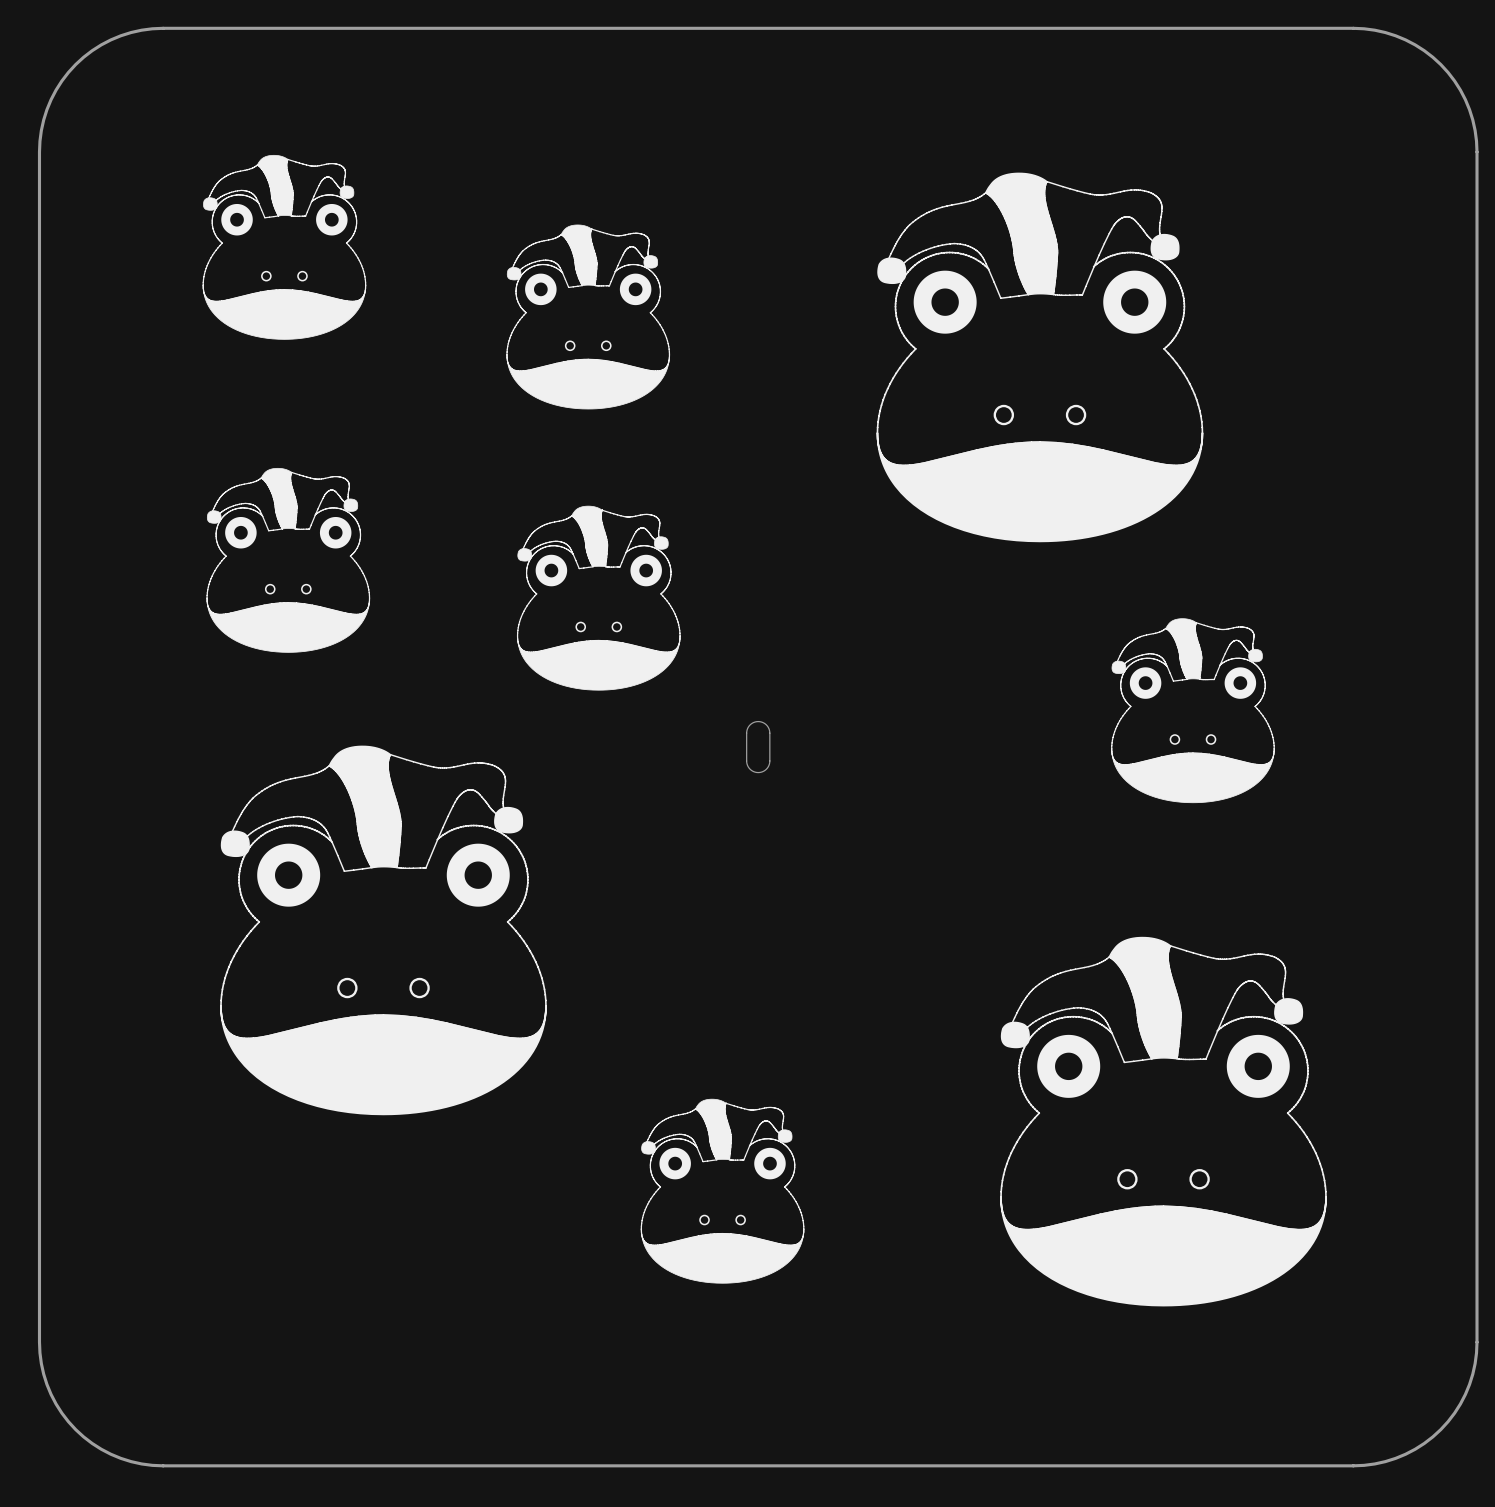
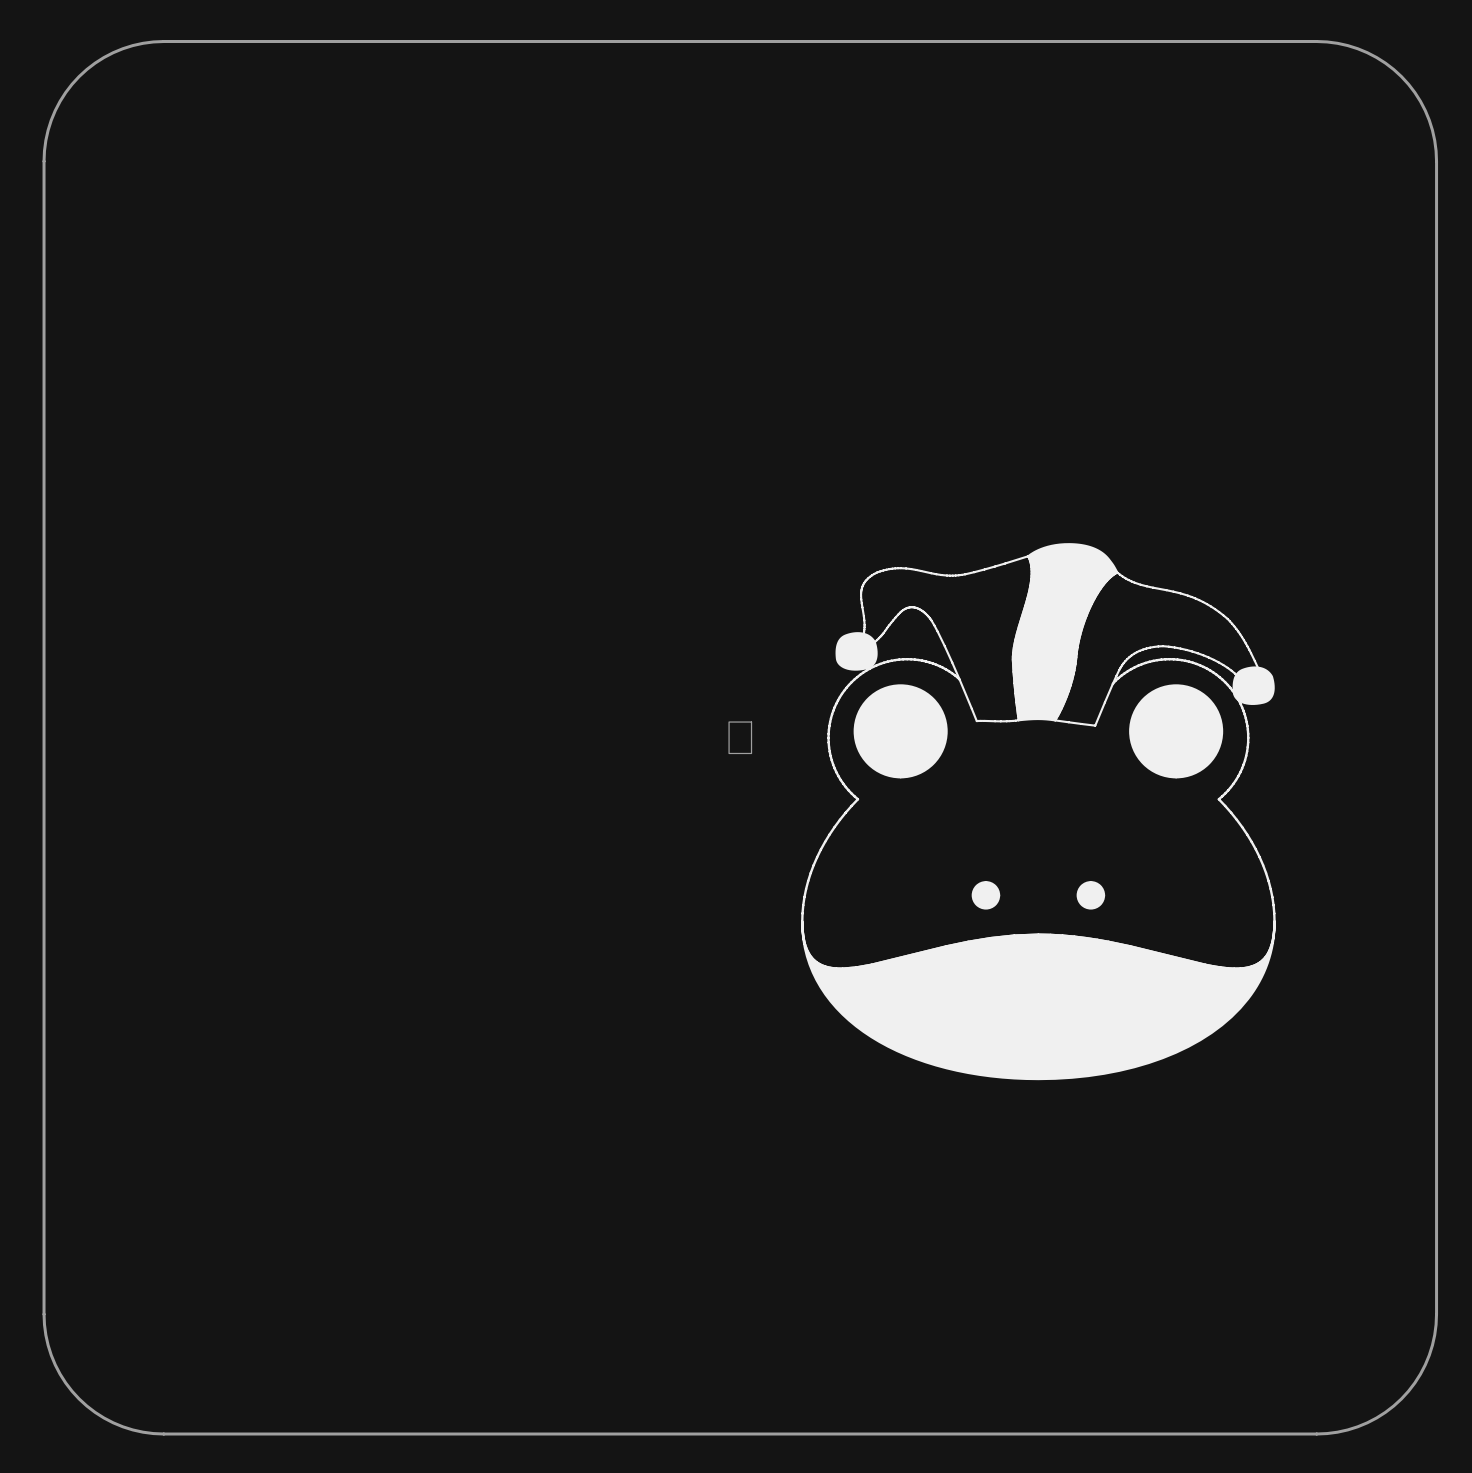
drawing: [203, 154, 294, 236] -> none
line: (287, 159) (287, 169) (293, 194) (291, 215) (305, 216) (319, 185) (325, 177) (330, 177) (340, 189) (344, 186) (345, 171) (339, 165) (331, 163) (311, 166) (287, 159) -> none
line: (257, 165) (223, 177) (215, 185) (208, 198) (214, 201) (229, 192) (247, 191) (255, 197) (264, 217) (278, 215) (273, 204) (267, 177) (257, 165) -> none
drawing: [877, 172, 1059, 334] -> none
line: (1046, 181) (1044, 191) (1045, 201) (1057, 250) (1053, 294) (1082, 295) (1109, 233) (1114, 224) (1121, 218) (1127, 216) (1132, 218) (1152, 240) (1160, 235) (1161, 204) (1158, 197) (1151, 192) (1134, 189) (1094, 194) (1046, 181) -> none
drawing: [316, 185, 355, 236] -> none
line: (985, 192) (994, 201) (1005, 218) (1011, 235) (1017, 270) (1028, 294) (1000, 298) (982, 256) (975, 249) (965, 245) (950, 243) (930, 248) (912, 256) (900, 266) (888, 259) (902, 233) (918, 218) (937, 208) (973, 199) (985, 192) -> none
line: (311, 202) (321, 195) (335, 195) (345, 200) (353, 210) (356, 219) (355, 228) (346, 243) (357, 257) (364, 273) (365, 290) (359, 300) (347, 300) (308, 292) (284, 289) (260, 292) (219, 301) (206, 298) (203, 288) (205, 271) (211, 257) (222, 243) (215, 235) (212, 226) (212, 217) (215, 209) (224, 199) (235, 195) (247, 196) (258, 203) -> none
drawing: [506, 224, 598, 306] -> none
line: (591, 229) (590, 239) (597, 263) (594, 285) (609, 285) (622, 255) (628, 247) (634, 247) (644, 258) (648, 255) (649, 240) (643, 234) (635, 233) (615, 235) (591, 229) -> none
drawing: [1103, 233, 1180, 334] -> none
line: (561, 234) (527, 247) (519, 255) (512, 267) (518, 271) (533, 262) (551, 260) (559, 266) (568, 287) (582, 285) (577, 273) (570, 247) (561, 234) -> none
drawing: [619, 255, 659, 306] -> none
line: (1093, 266) (1114, 254) (1127, 252) (1141, 253) (1162, 263) (1172, 272) (1179, 283) (1184, 301) (1182, 319) (1175, 335) (1164, 348) (1186, 378) (1199, 410) (1202, 427) (1201, 444) (1197, 456) (1189, 462) (1178, 465) (1165, 464) (1088, 447) (1039, 442) (991, 447) (909, 465) (893, 464) (884, 458) (879, 448) (877, 439) (881, 405) (893, 378) (915, 348) (902, 333) (896, 316) (896, 298) (902, 280) (909, 270) (919, 261) (941, 253) (966, 255) (978, 260) (988, 269) -> none
drawing: [202, 270, 367, 340] -> none
line: (615, 271) (625, 265) (638, 265) (649, 269) (657, 279) (660, 288) (659, 297) (650, 312) (661, 327) (668, 343) (669, 360) (663, 369) (650, 370) (612, 361) (588, 359) (564, 361) (523, 370) (510, 367) (507, 357) (509, 340) (514, 327) (526, 312) (519, 304) (516, 296) (516, 287) (519, 278) (527, 269) (538, 264) (551, 265) (562, 272) -> none
drawing: [506, 340, 670, 410] -> none
drawing: [876, 404, 1204, 543] -> none
drawing: [206, 467, 298, 549] -> none
line: (291, 472) (291, 482) (297, 507) (295, 528) (309, 529) (322, 498) (328, 490) (334, 491) (344, 502) (348, 499) (349, 484) (343, 478) (335, 476) (315, 479) (291, 472) -> none
line: (261, 478) (270, 490) (277, 517) (282, 528) (268, 530) (259, 510) (251, 504) (233, 505) (218, 514) (212, 511) (219, 498) (227, 490) (261, 478) -> none
drawing: [319, 498, 359, 549] -> none
drawing: [517, 505, 608, 587] -> none
line: (602, 510) (626, 516) (646, 514) (654, 515) (659, 521) (658, 537) (655, 539) (645, 528) (639, 528) (633, 536) (619, 567) (605, 566) (607, 544) (601, 520) (602, 510) -> none
line: (315, 515) (325, 508) (338, 508) (349, 513) (357, 523) (360, 532) (359, 541) (350, 556) (361, 570) (368, 587) (369, 603) (363, 613) (350, 614) (312, 605) (288, 602) (264, 605) (223, 614) (210, 611) (207, 601) (209, 584) (214, 570) (226, 556) (219, 548) (216, 539) (216, 530) (219, 522) (228, 512) (239, 508) (251, 509) (262, 516) -> none
line: (571, 515) (581, 528) (587, 554) (593, 566) (579, 568) (570, 547) (561, 542) (543, 543) (529, 552) (523, 549) (530, 536) (537, 528) (571, 515) -> none
drawing: [630, 536, 669, 587] -> none
drawing: none -> [1011, 543, 1119, 722]
line: (625, 552) (636, 546) (649, 546) (660, 551) (668, 561) (670, 570) (670, 579) (660, 593) (672, 608) (678, 624) (679, 641) (673, 650) (661, 651) (622, 642) (598, 640) (574, 642) (533, 652) (521, 648) (517, 638) (519, 622) (525, 608) (536, 593) (530, 586) (526, 577) (526, 568) (529, 559) (538, 550) (549, 546) (561, 547) (573, 554) -> none
drawing: [206, 583, 370, 653] -> none
drawing: [1111, 618, 1203, 699] -> none
drawing: [517, 621, 681, 691] -> none
line: (1196, 622) (1220, 629) (1240, 626) (1248, 628) (1253, 634) (1253, 649) (1249, 652) (1239, 641) (1233, 641) (1227, 648) (1214, 679) (1199, 679) (1201, 657) (1195, 632) (1196, 622) -> none
line: (1165, 628) (1175, 641) (1181, 667) (1187, 679) (1173, 681) (1164, 660) (1155, 654) (1138, 656) (1123, 665) (1117, 661) (1124, 648) (1132, 641) (1165, 628) -> none
drawing: none -> [835, 632, 948, 779]
drawing: [1224, 648, 1263, 699] -> none
line: (1219, 665) (1230, 659) (1243, 658) (1254, 663) (1262, 673) (1265, 682) (1264, 691) (1255, 706) (1266, 721) (1272, 737) (1273, 754) (1267, 763) (1255, 764) (1217, 755) (1192, 753) (1168, 755) (1127, 764) (1115, 761) (1111, 751) (1113, 734) (1119, 721) (1130, 706) (1124, 698) (1121, 690) (1121, 681) (1124, 672) (1132, 662) (1143, 658) (1156, 659) (1167, 666) -> none
drawing: none -> [1232, 666, 1275, 705]
line: none -> (959, 679) (945, 669) (929, 662) (911, 659) (891, 660) (876, 665) (860, 674) (846, 687) (836, 703) (828, 729) (830, 755) (840, 780) (857, 799) (839, 819) (825, 841) (813, 865) (806, 889) (802, 913) (803, 937) (809, 955) (820, 964) (836, 968) (856, 967) (968, 941) (1014, 935) (1038, 934) (1074, 936) (1108, 941) (1227, 968) (1251, 966) (1263, 959) (1271, 944) (1274, 930) (1273, 905) (1268, 880) (1251, 841) (1236, 819) (1218, 799) (1238, 776) (1247, 751) (1247, 725) (1238, 700) (1227, 684) (1213, 672) (1196, 663) (1181, 660) (1161, 659) (1145, 662) (1127, 671) (1112, 683)
line: none -> (959, 679) (934, 625) (927, 615) (918, 608) (910, 607) (901, 611) (874, 642) (863, 634) (864, 620) (861, 595) (864, 583) (874, 573) (889, 569) (906, 568) (941, 575) (958, 575) (1028, 556) (1031, 569) (1030, 585) (1015, 640) (1012, 656) (1018, 720) (976, 721) (959, 679)
line: none -> (1112, 683) (1120, 667) (1129, 657) (1142, 649) (1158, 646) (1180, 648) (1203, 655) (1227, 667) (1240, 679) (1258, 669) (1238, 631) (1227, 618) (1215, 609) (1187, 595) (1134, 582) (1117, 572) (1103, 584) (1088, 610) (1080, 634) (1070, 685) (1055, 720) (1095, 725) (1112, 683)
part footprint: [746, 721, 771, 773] -> [728, 721, 752, 754]
drawing: [1111, 734, 1275, 804] -> none
drawing shape: [1205, 734, 1217, 745] -> [1129, 684, 1224, 779]
drawing: [220, 745, 402, 907] -> none
line: (390, 754) (438, 767) (478, 762) (494, 765) (501, 770) (505, 777) (503, 808) (496, 813) (476, 791) (471, 789) (464, 791) (458, 797) (452, 806) (425, 868) (396, 867) (401, 823) (388, 774) (388, 764) (390, 754) -> none
line: (329, 765) (317, 772) (280, 781) (261, 791) (245, 806) (231, 832) (244, 839) (256, 829) (273, 821) (293, 816) (309, 818) (319, 822) (325, 829) (344, 871) (371, 867) (361, 843) (354, 808) (348, 791) (338, 774) (329, 765) -> none
drawing: [446, 806, 524, 907] -> none
line: (437, 839) (458, 827) (471, 825) (484, 826) (506, 836) (515, 845) (522, 856) (527, 874) (526, 892) (519, 908) (507, 921) (530, 951) (543, 983) (545, 1000) (545, 1017) (540, 1029) (533, 1035) (522, 1038) (508, 1037) (431, 1020) (383, 1015) (335, 1020) (253, 1038) (237, 1037) (228, 1031) (222, 1021) (221, 1012) (225, 978) (236, 951) (259, 921) (245, 906) (239, 889) (239, 871) (245, 853) (253, 843) (262, 834) (284, 826) (309, 828) (321, 833) (332, 842) -> none
drawing: none -> [801, 881, 1276, 1081]
drawing: [1000, 936, 1182, 1098] -> none
line: (1170, 945) (1168, 955) (1168, 965) (1181, 1015) (1177, 1058) (1205, 1059) (1232, 997) (1238, 988) (1244, 982) (1251, 980) (1256, 982) (1276, 1005) (1283, 999) (1285, 969) (1281, 962) (1274, 957) (1258, 954) (1218, 958) (1170, 945) -> none
line: (1109, 957) (1118, 965) (1128, 982) (1134, 1000) (1141, 1034) (1151, 1058) (1124, 1062) (1105, 1021) (1099, 1014) (1089, 1009) (1073, 1008) (1053, 1012) (1036, 1020) (1024, 1030) (1011, 1023) (1025, 997) (1041, 982) (1060, 972) (1097, 964) (1109, 957) -> none
drawing: [220, 977, 547, 1116] -> none
drawing: [1226, 998, 1304, 1098] -> none
line: (1217, 1030) (1238, 1018) (1251, 1016) (1264, 1017) (1286, 1027) (1295, 1036) (1302, 1047) (1307, 1065) (1306, 1083) (1299, 1099) (1287, 1113) (1310, 1142) (1323, 1174) (1325, 1191) (1325, 1208) (1320, 1220) (1313, 1227) (1302, 1229) (1288, 1228) (1211, 1211) (1163, 1206) (1115, 1211) (1033, 1229) (1017, 1228) (1008, 1223) (1002, 1213) (1001, 1203) (1005, 1169) (1016, 1142) (1039, 1113) (1025, 1097) (1019, 1080) (1019, 1062) (1025, 1045) (1033, 1034) (1042, 1025) (1064, 1017) (1089, 1019) (1101, 1025) (1112, 1033) -> none
drawing: [641, 1098, 732, 1180] -> none
line: (726, 1103) (725, 1113) (731, 1137) (729, 1159) (743, 1160) (757, 1129) (763, 1121) (769, 1121) (778, 1132) (782, 1130) (783, 1114) (778, 1108) (769, 1107) (749, 1109) (726, 1103) -> none
line: (695, 1108) (661, 1121) (653, 1129) (646, 1142) (652, 1145) (667, 1136) (685, 1135) (693, 1140) (703, 1161) (716, 1159) (711, 1147) (705, 1121) (695, 1108) -> none
drawing: [754, 1129, 793, 1180] -> none
line: (749, 1145) (760, 1139) (773, 1139) (783, 1144) (792, 1154) (794, 1163) (794, 1172) (784, 1186) (795, 1201) (802, 1217) (803, 1234) (797, 1243) (785, 1244) (746, 1236) (722, 1233) (698, 1236) (657, 1245) (644, 1241) (641, 1232) (643, 1215) (649, 1201) (660, 1186) (653, 1179) (650, 1170) (650, 1161) (653, 1152) (662, 1143) (673, 1139) (685, 1140) (696, 1147) -> none
drawing: [1000, 1169, 1327, 1307] -> none
drawing: [640, 1214, 805, 1284] -> none

